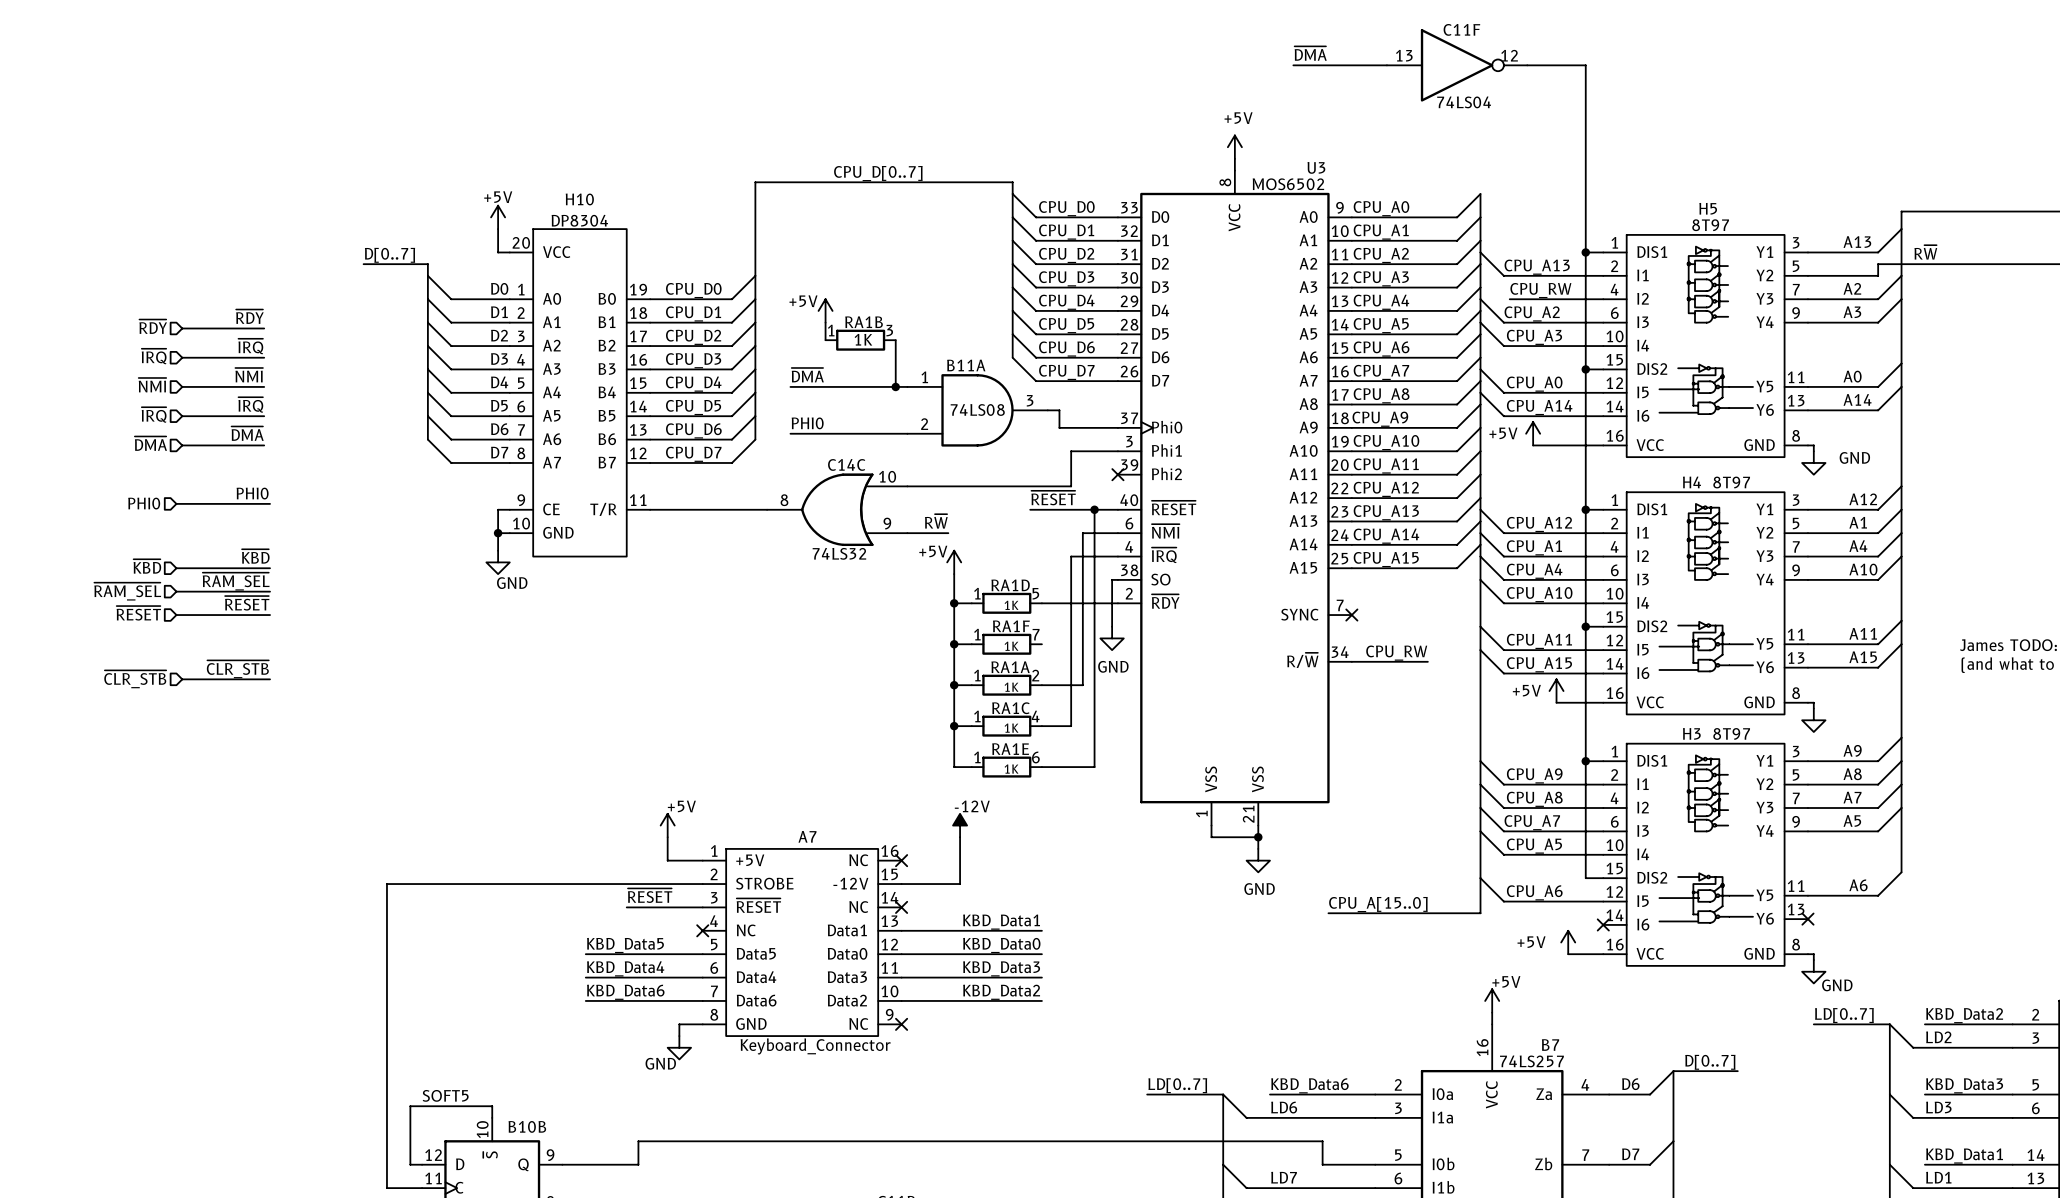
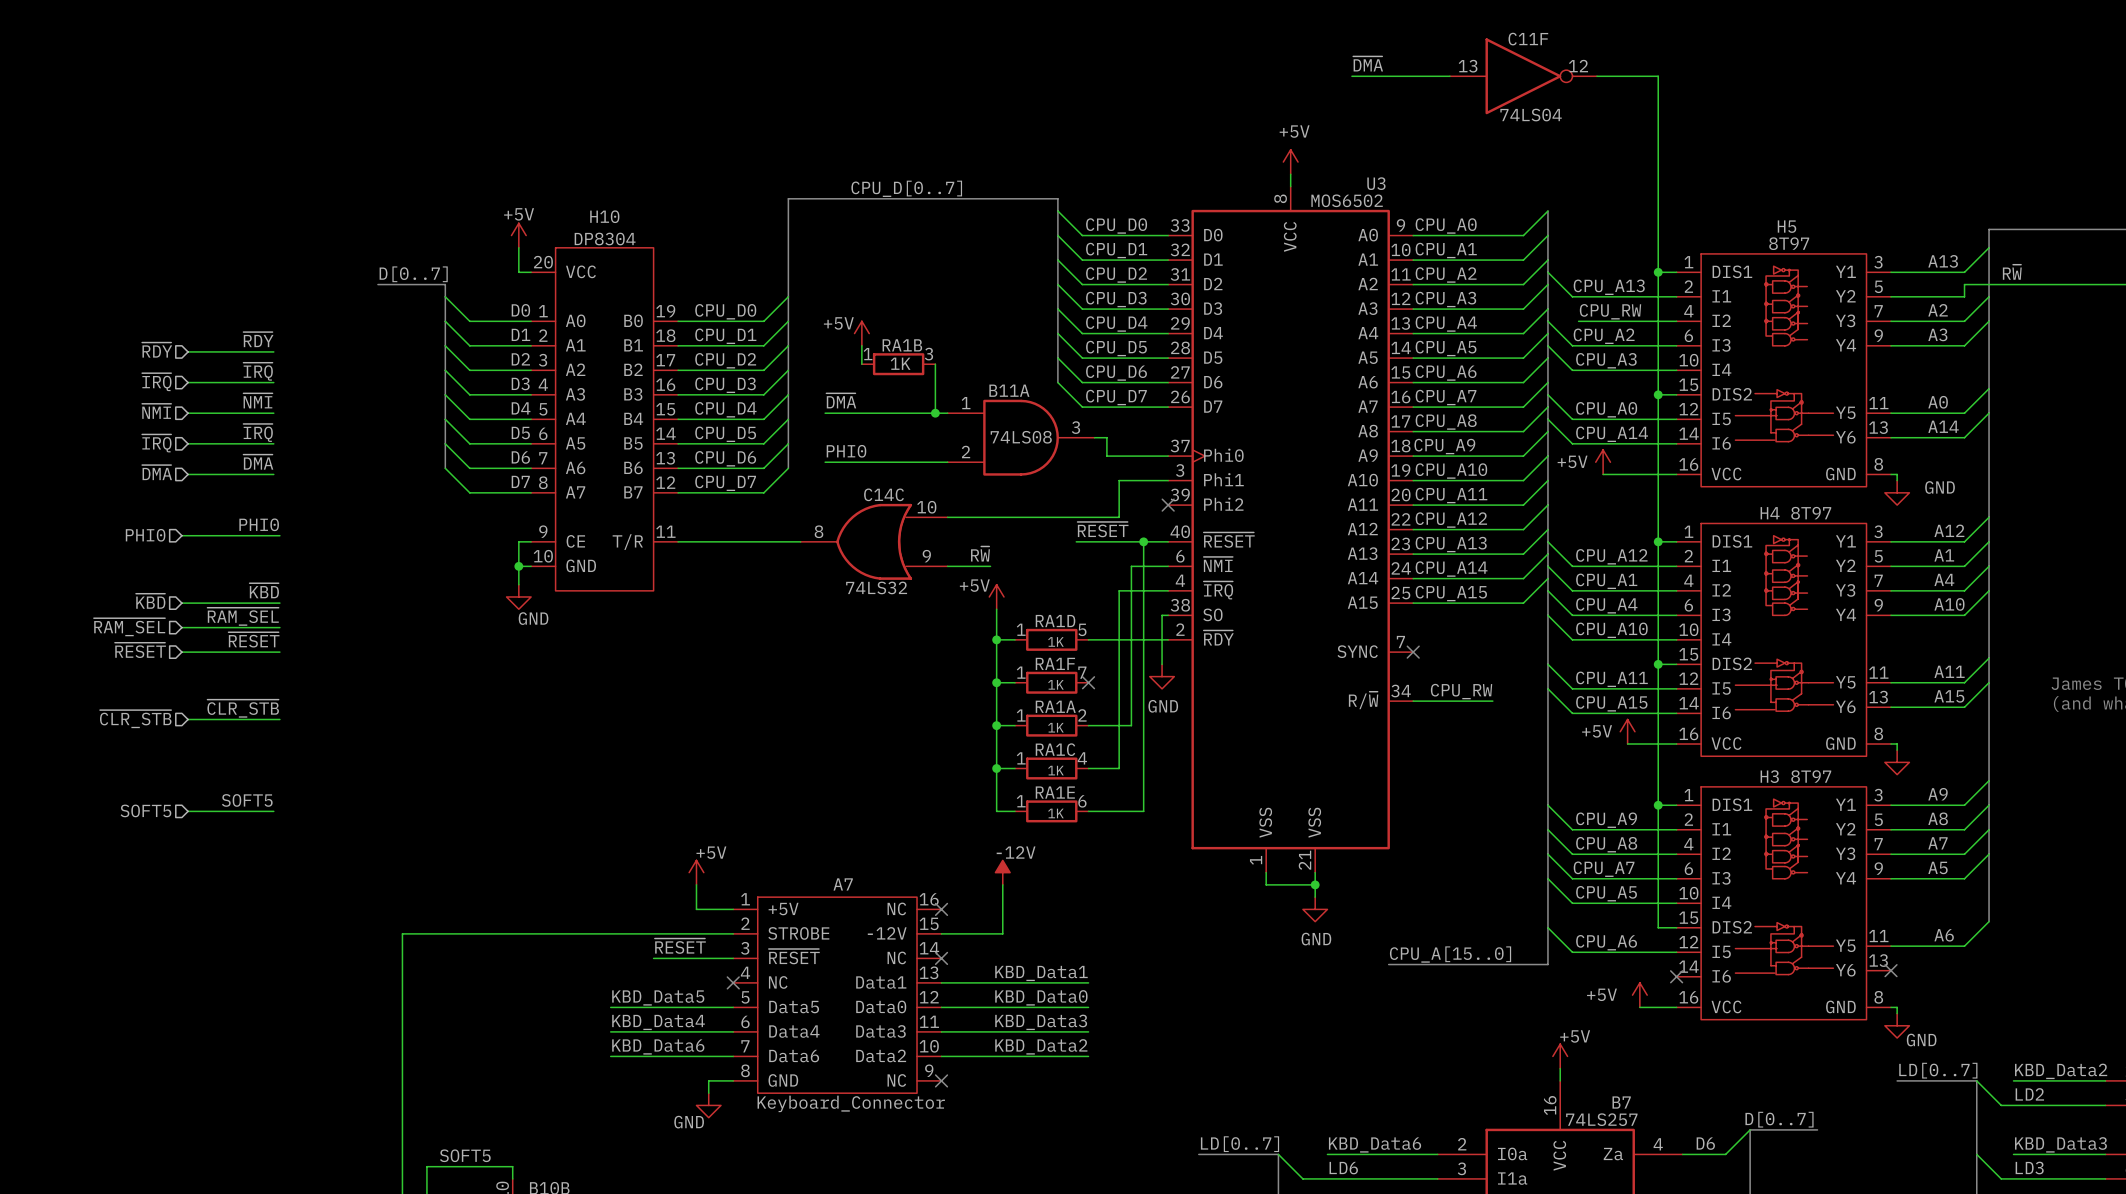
no-connect mark: none -> (1088, 682)
label: none -> SOFT5 (247, 800)
hierarchical label: none -> SOFT5 (145, 810)
wire: none -> (188, 811) (273, 811)

